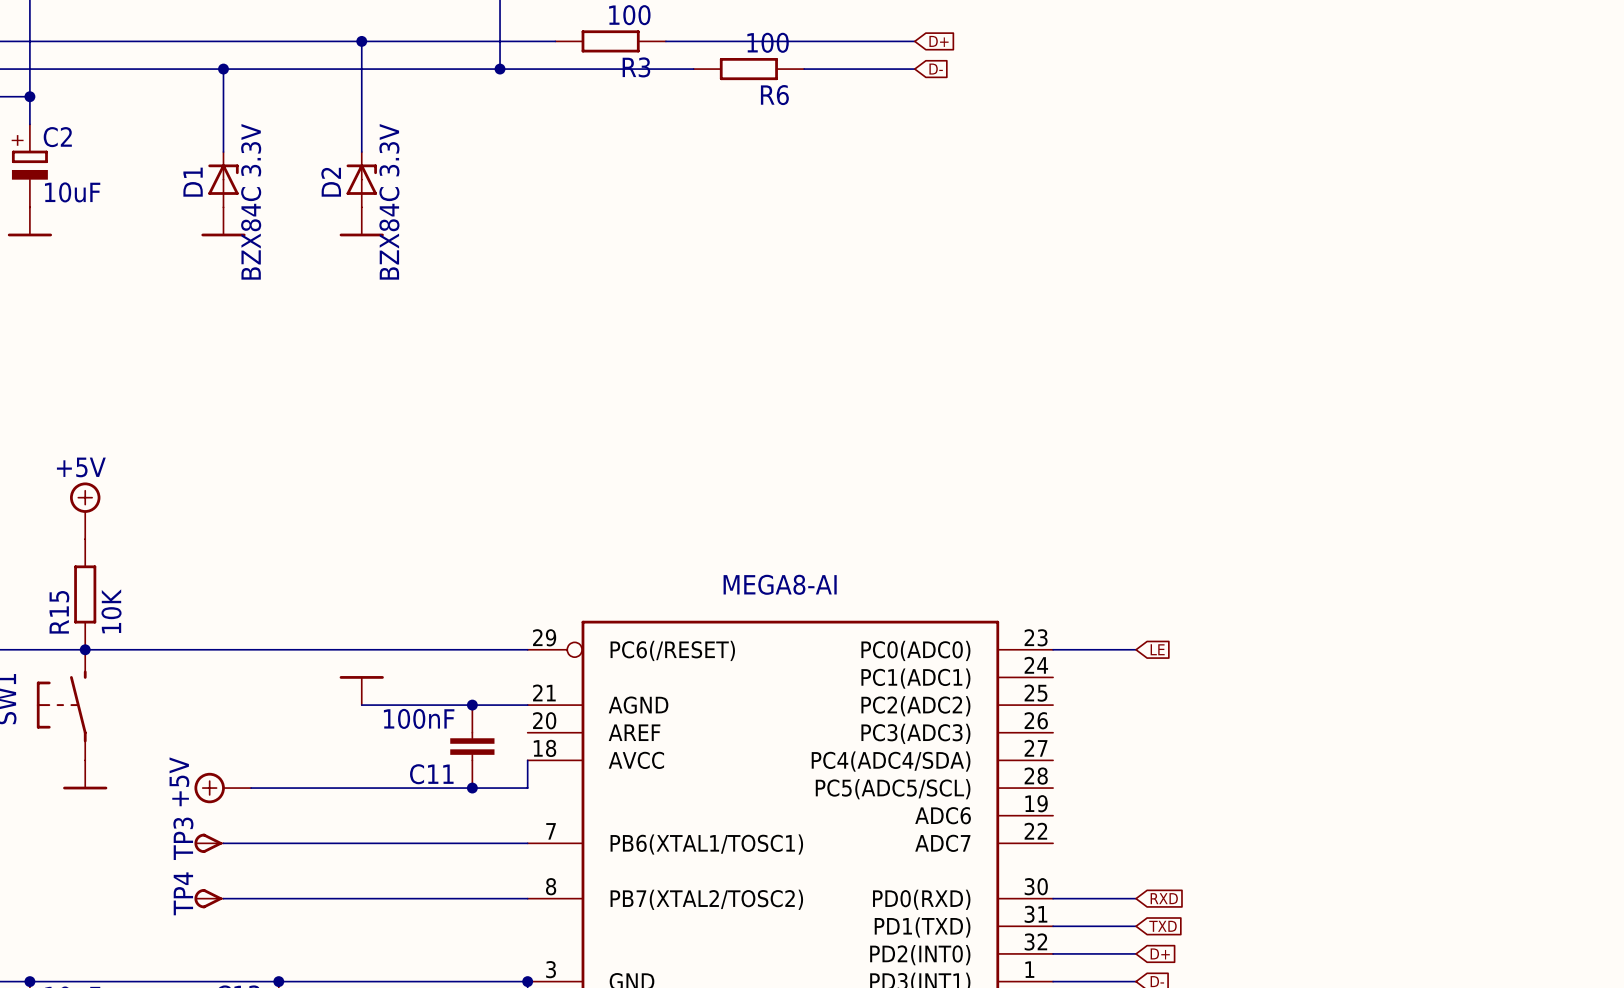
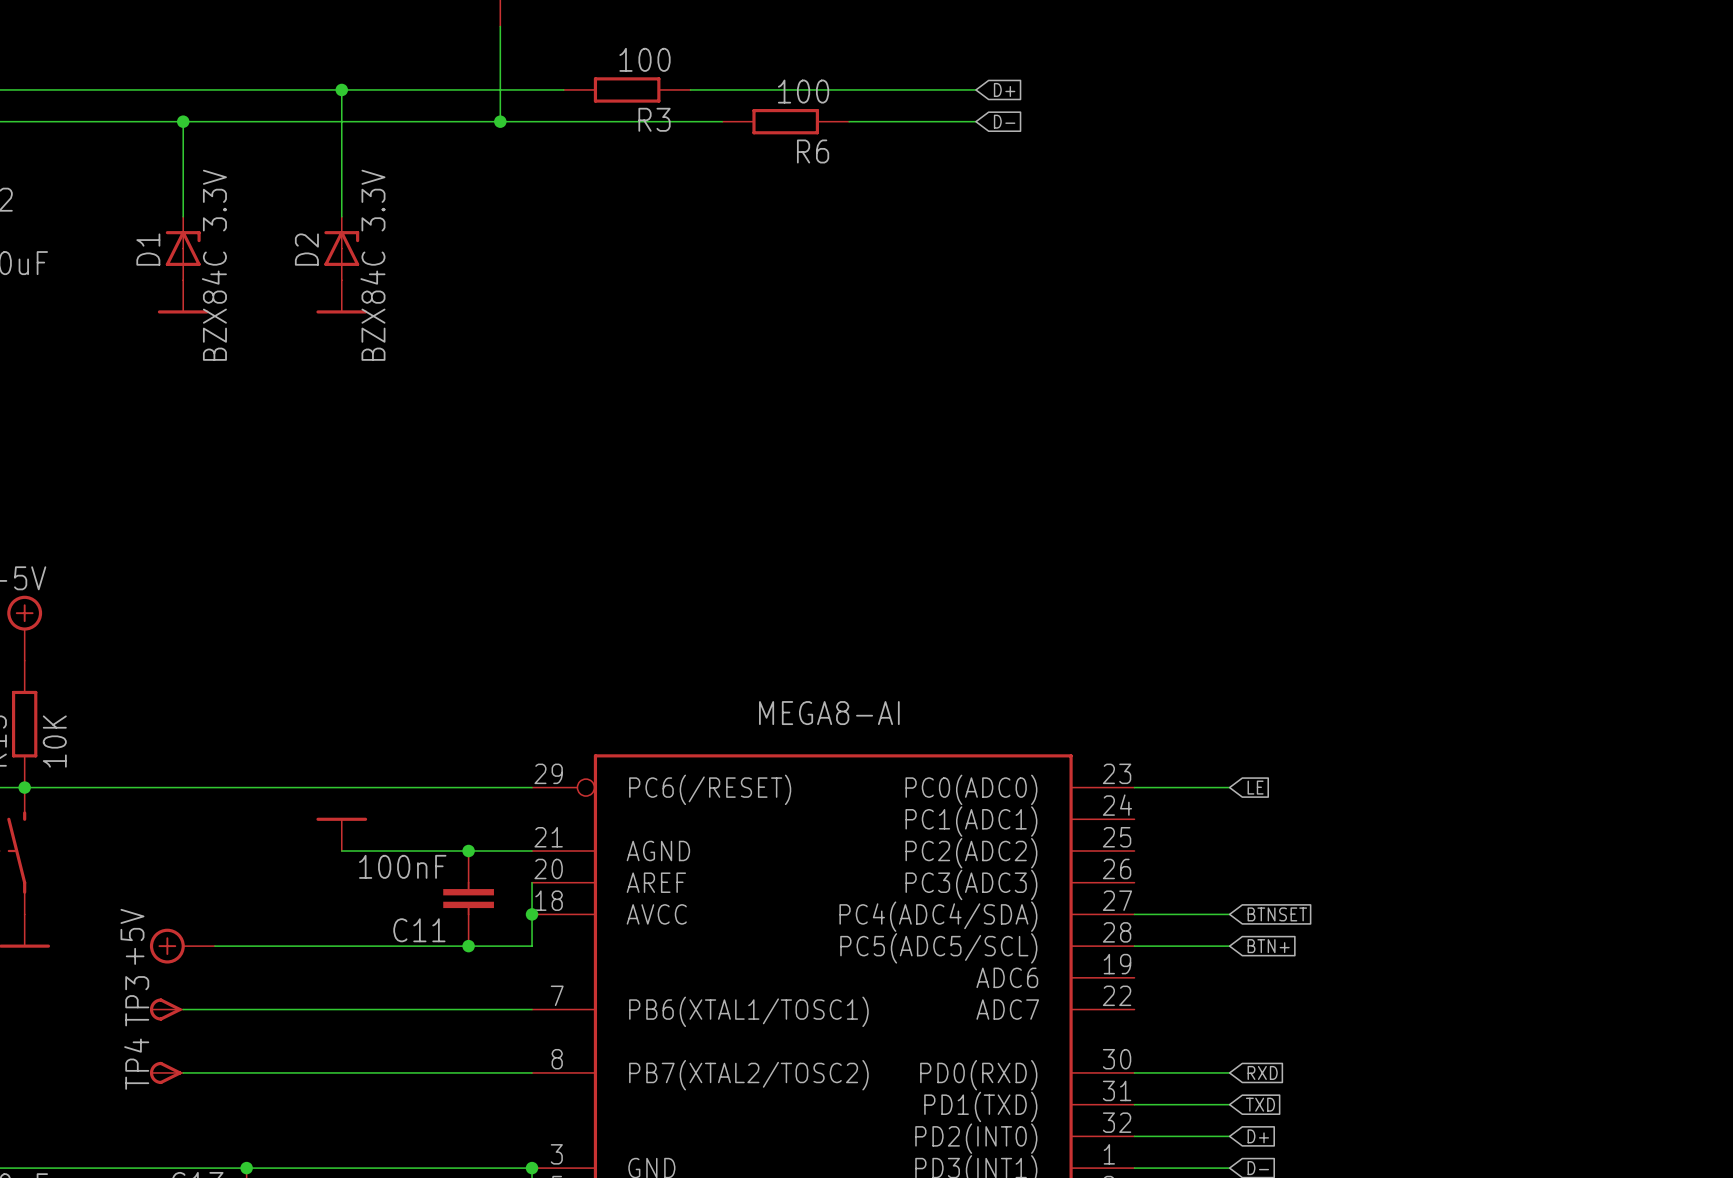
wire: none -> (532, 882) (532, 914)
junction: none -> (532, 914)
wire: none -> (1134, 914) (1229, 914)
global label: none -> BTNSET (1277, 914)
wire: none -> (1134, 946) (1229, 946)
global label: none -> BTN+ (1268, 946)

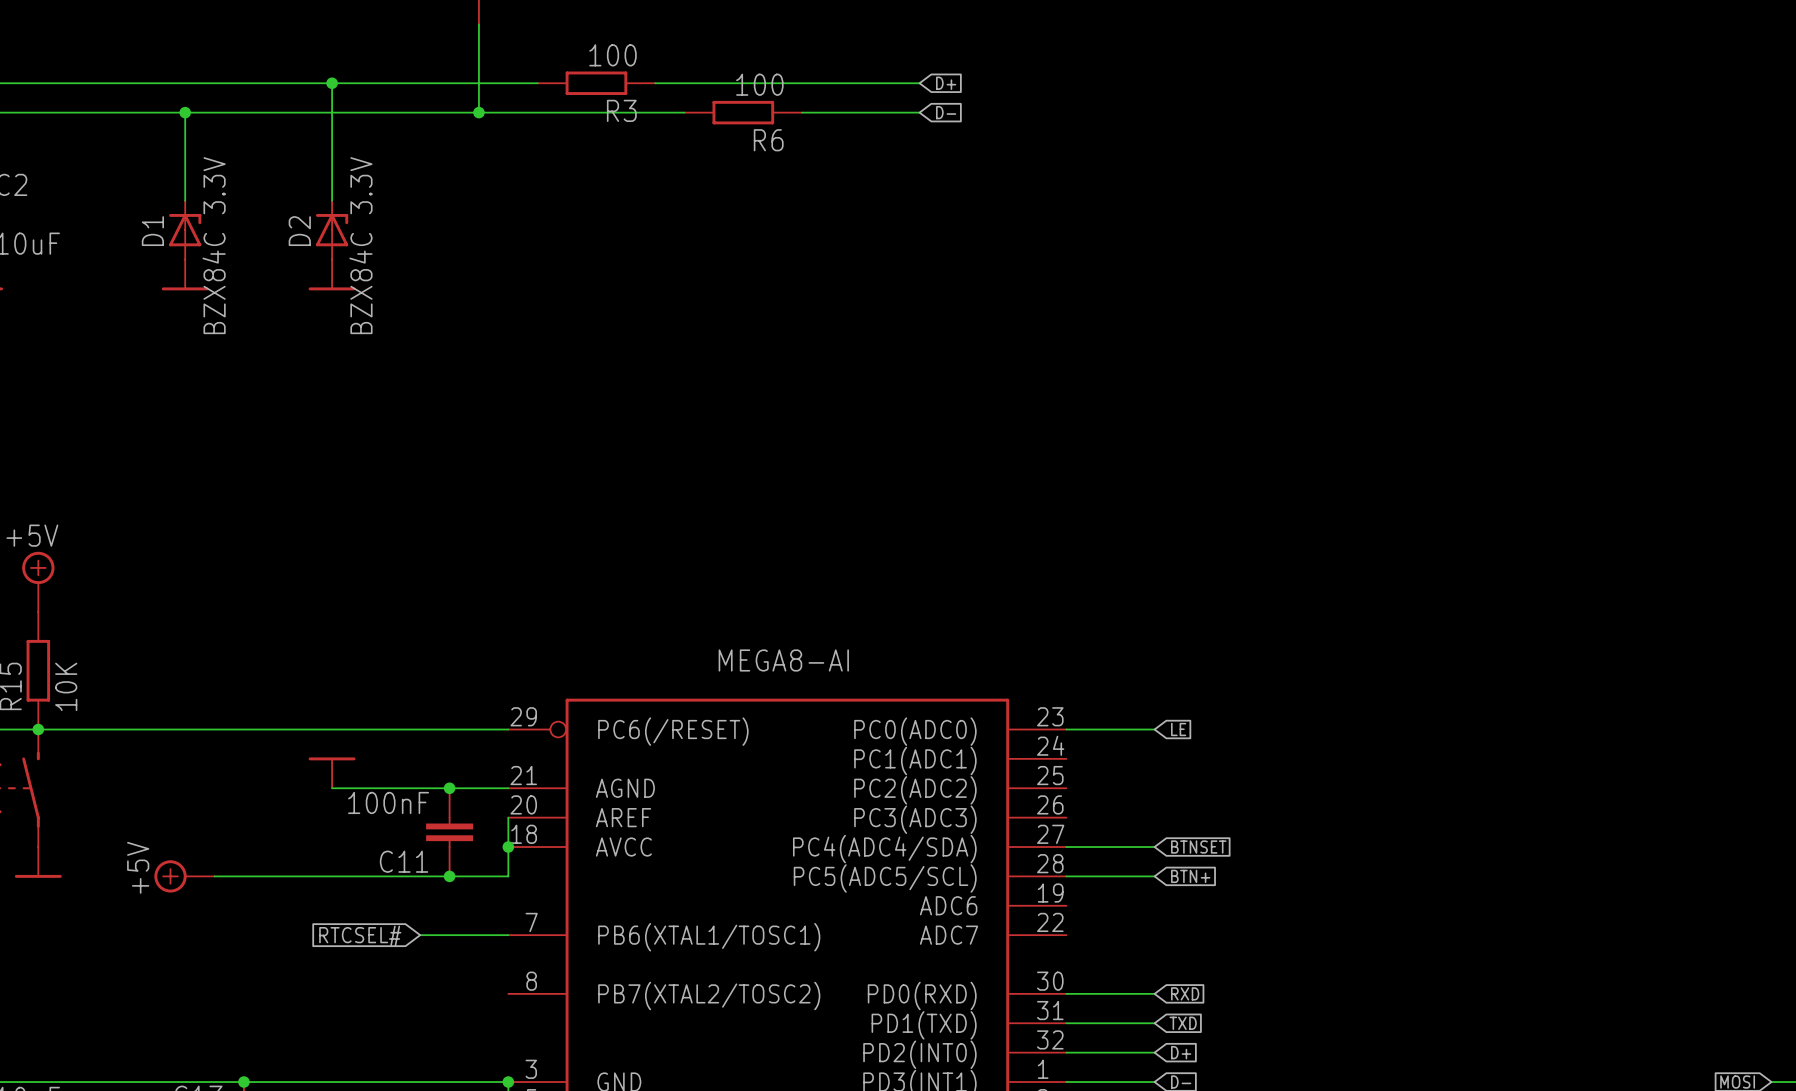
TP3: (166, 1009) -> none
wire: (183, 1009) (436, 1009) -> none
global label: none -> RTCSEL# (360, 935)
TP4: (166, 1072) -> none
wire: (183, 1072) (532, 1072) -> none

